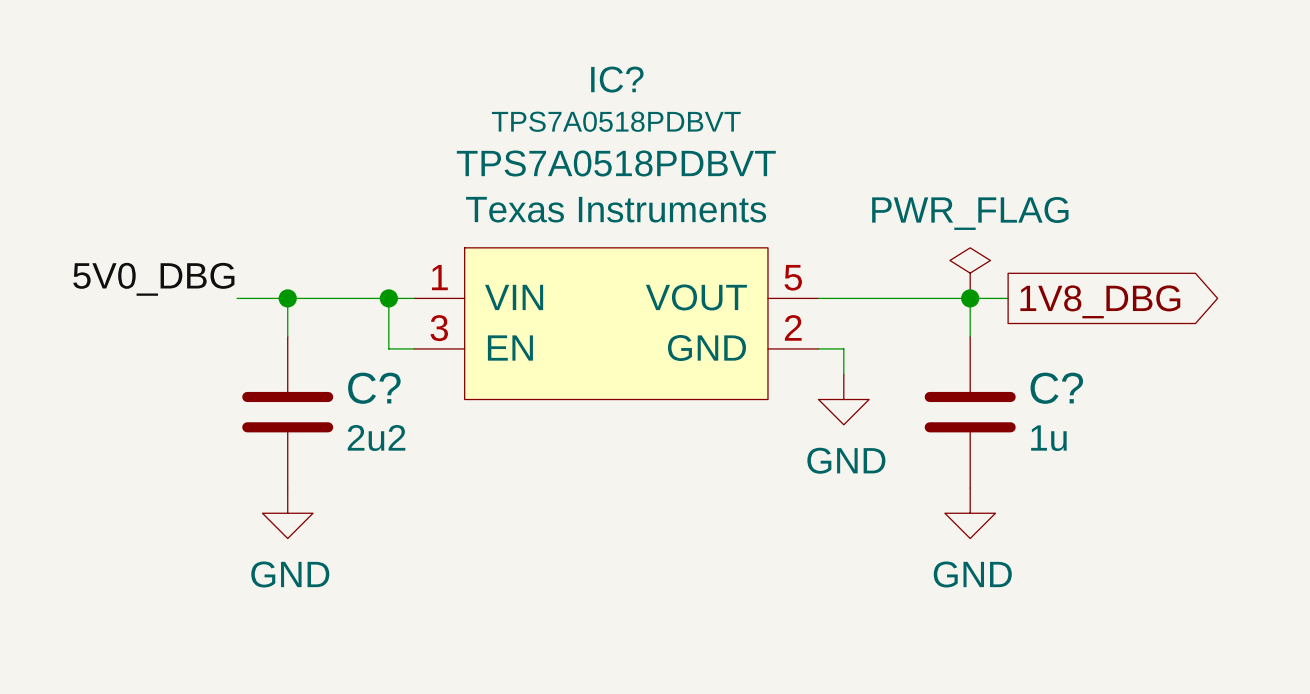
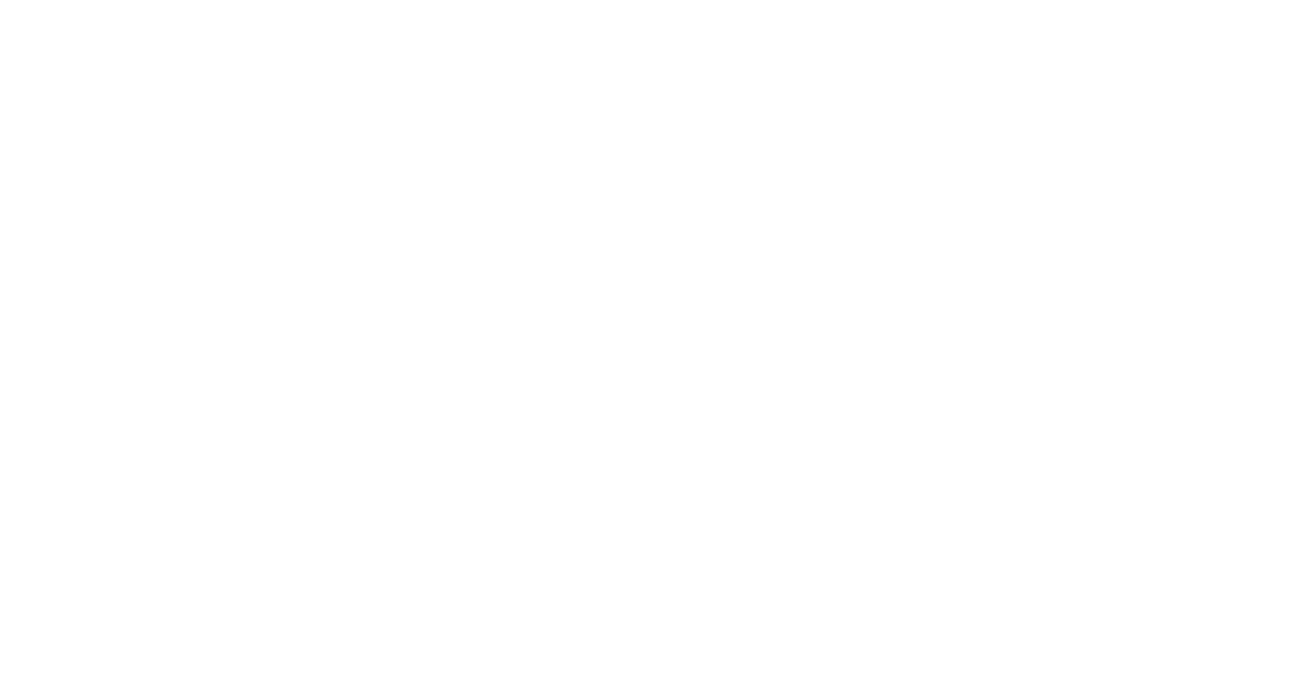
power symbol: PWR_FLAG (970, 273) -> none
label: 5V0_DBG (153, 279) -> none
wire: (237, 298) (414, 298) -> none
wire: (287, 298) (287, 336) -> none
junction: (287, 298) -> none
wire: (388, 298) (388, 348) (414, 348) -> none
junction: (388, 298) -> none
wire: (818, 298) (1008, 298) -> none
wire: (970, 298) (970, 336) -> none
junction: (970, 298) -> none
global label: 1V8_DBG (1100, 301) -> none
IC?: TPS7A0518PDBVT (616, 323) -> none
wire: (818, 348) (843, 348) (843, 374) -> none
power symbol: GND (843, 399) -> none
C?: (287, 412) -> none
C?: (970, 412) -> none
power symbol: GND (287, 513) -> none
power symbol: GND (970, 513) -> none

